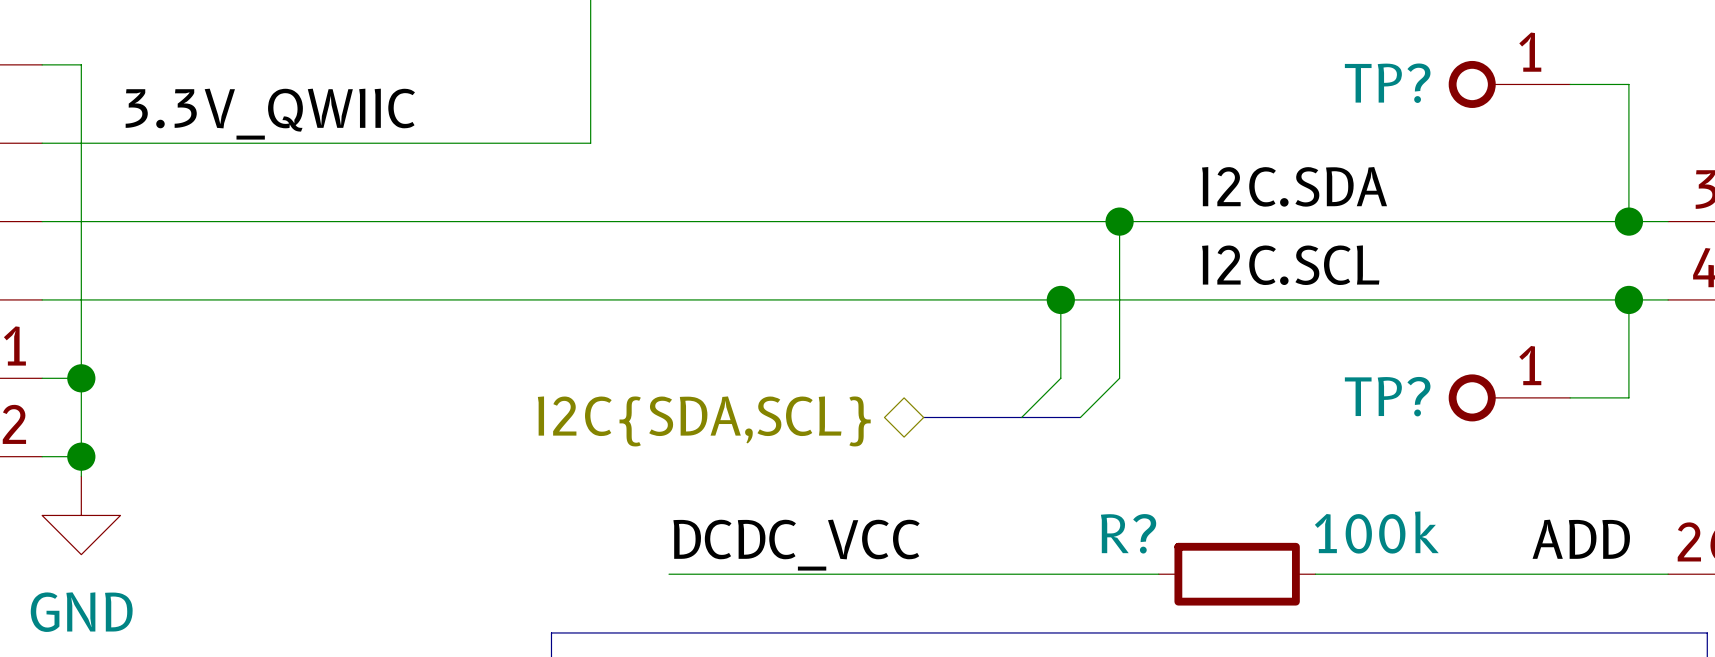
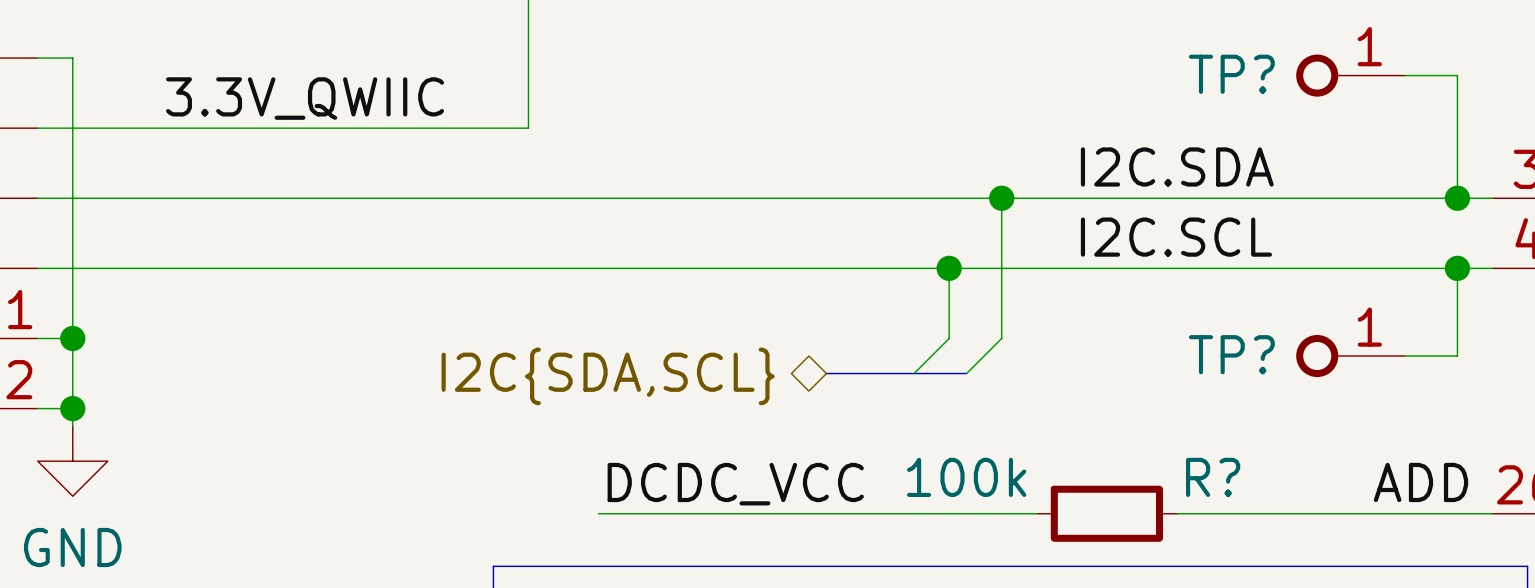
label position: 3.3V_QWIIC (270, 114) -> 3.3V_QWIIC (305, 98)
R? text position: 100k (1376, 532) -> 100k (966, 477)
R? name position: R? (1128, 533) -> R? (1213, 477)

